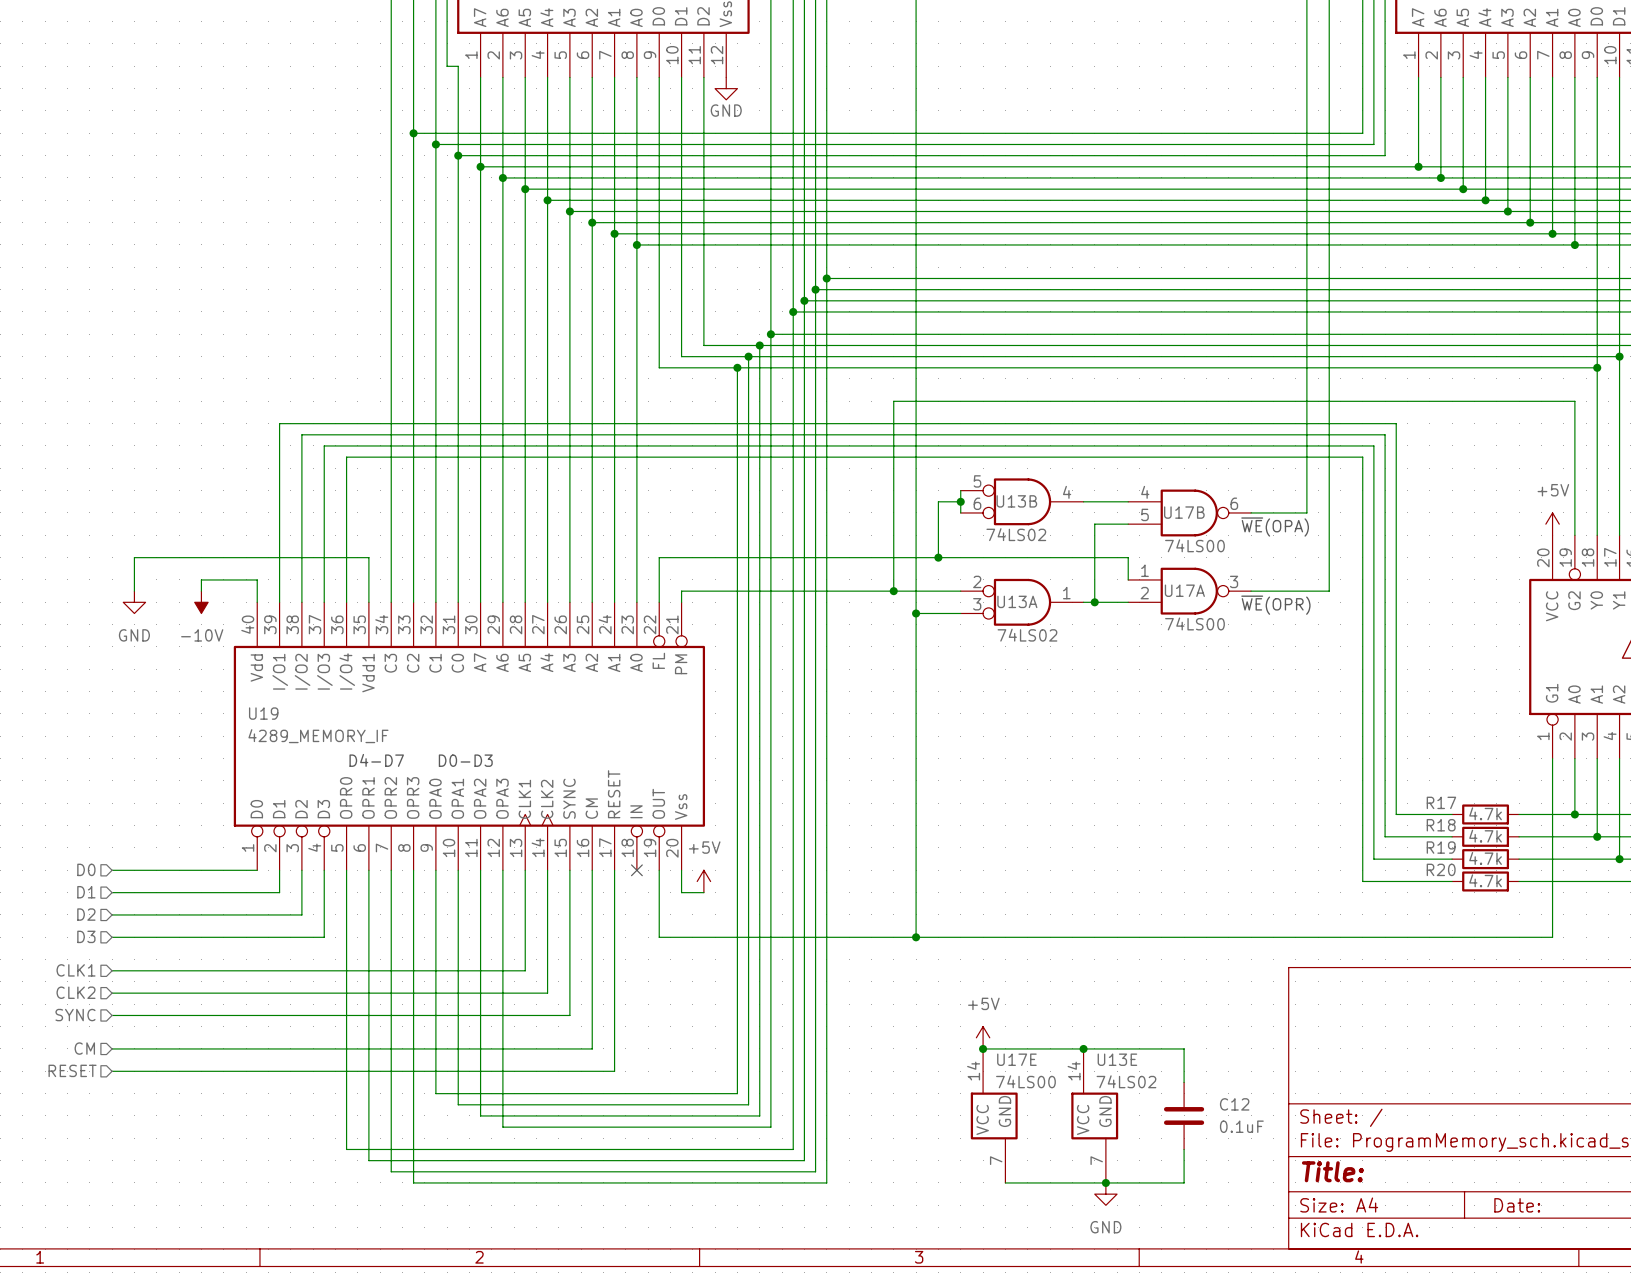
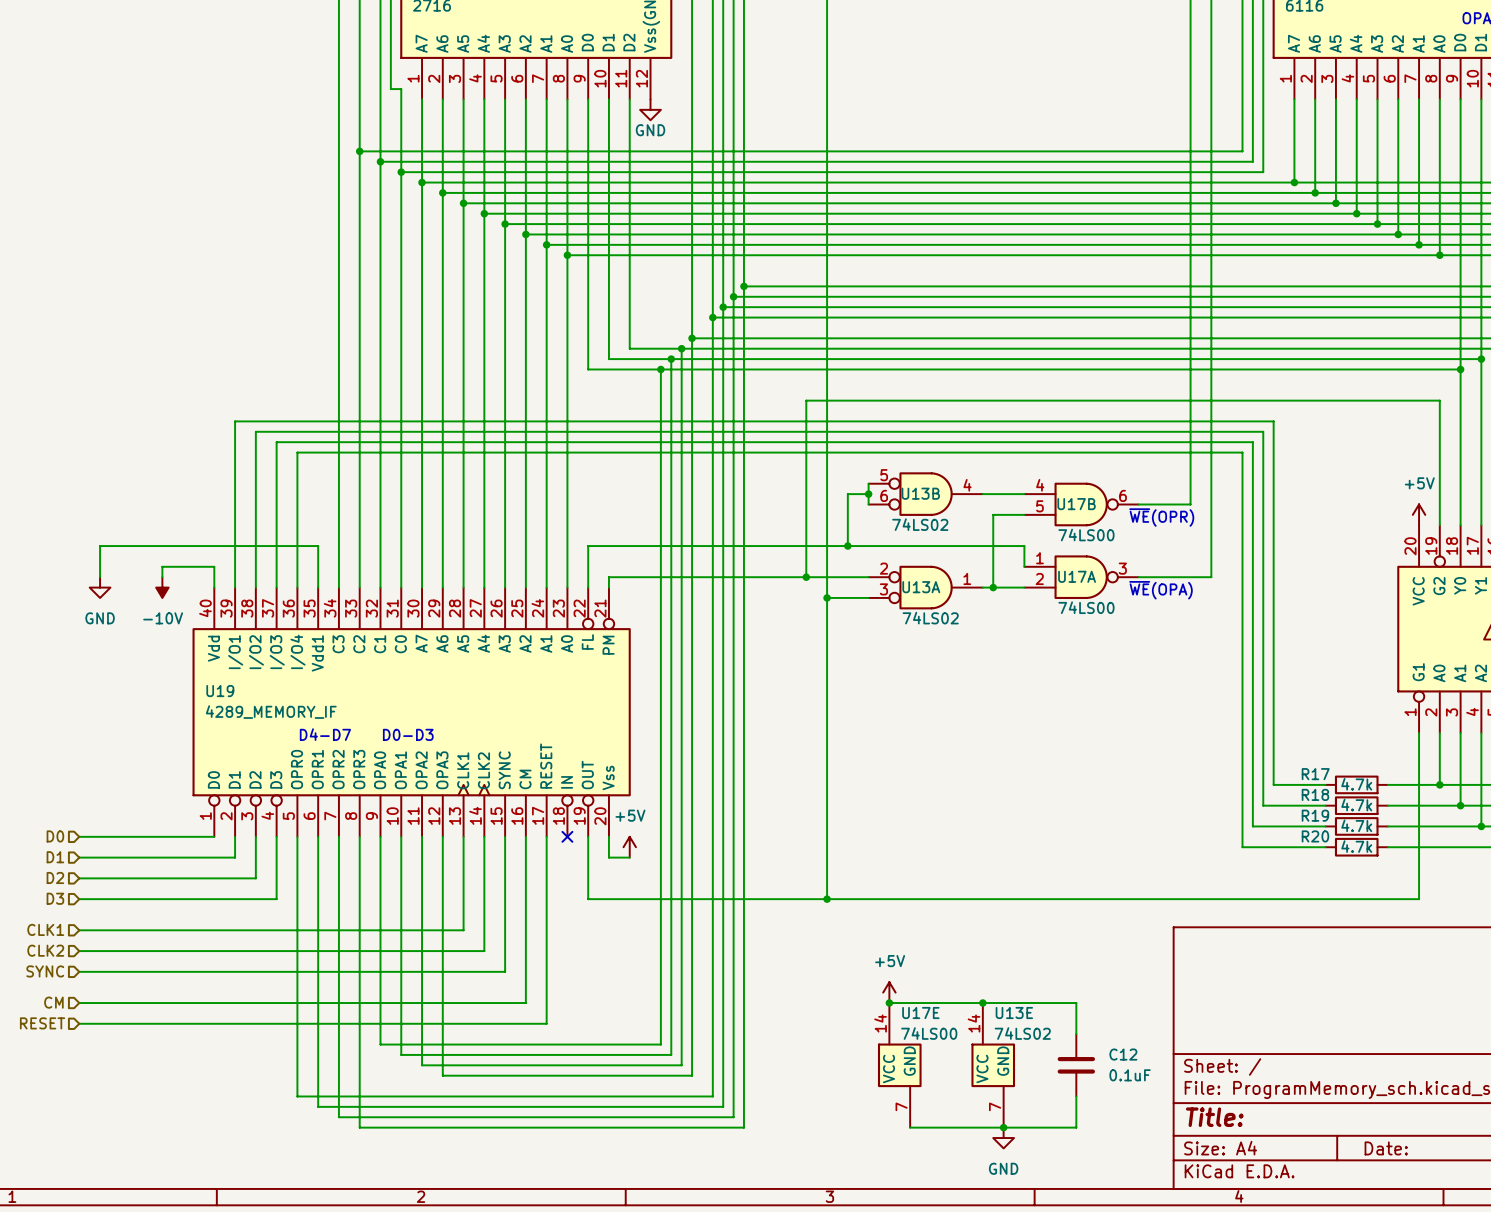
text: ~{WE}(OPA) (1275, 527) -> ~{WE}(OPR) (1161, 517)
text: ~{WE}(OPR) (1275, 605) -> ~{WE}(OPA) (1160, 590)

